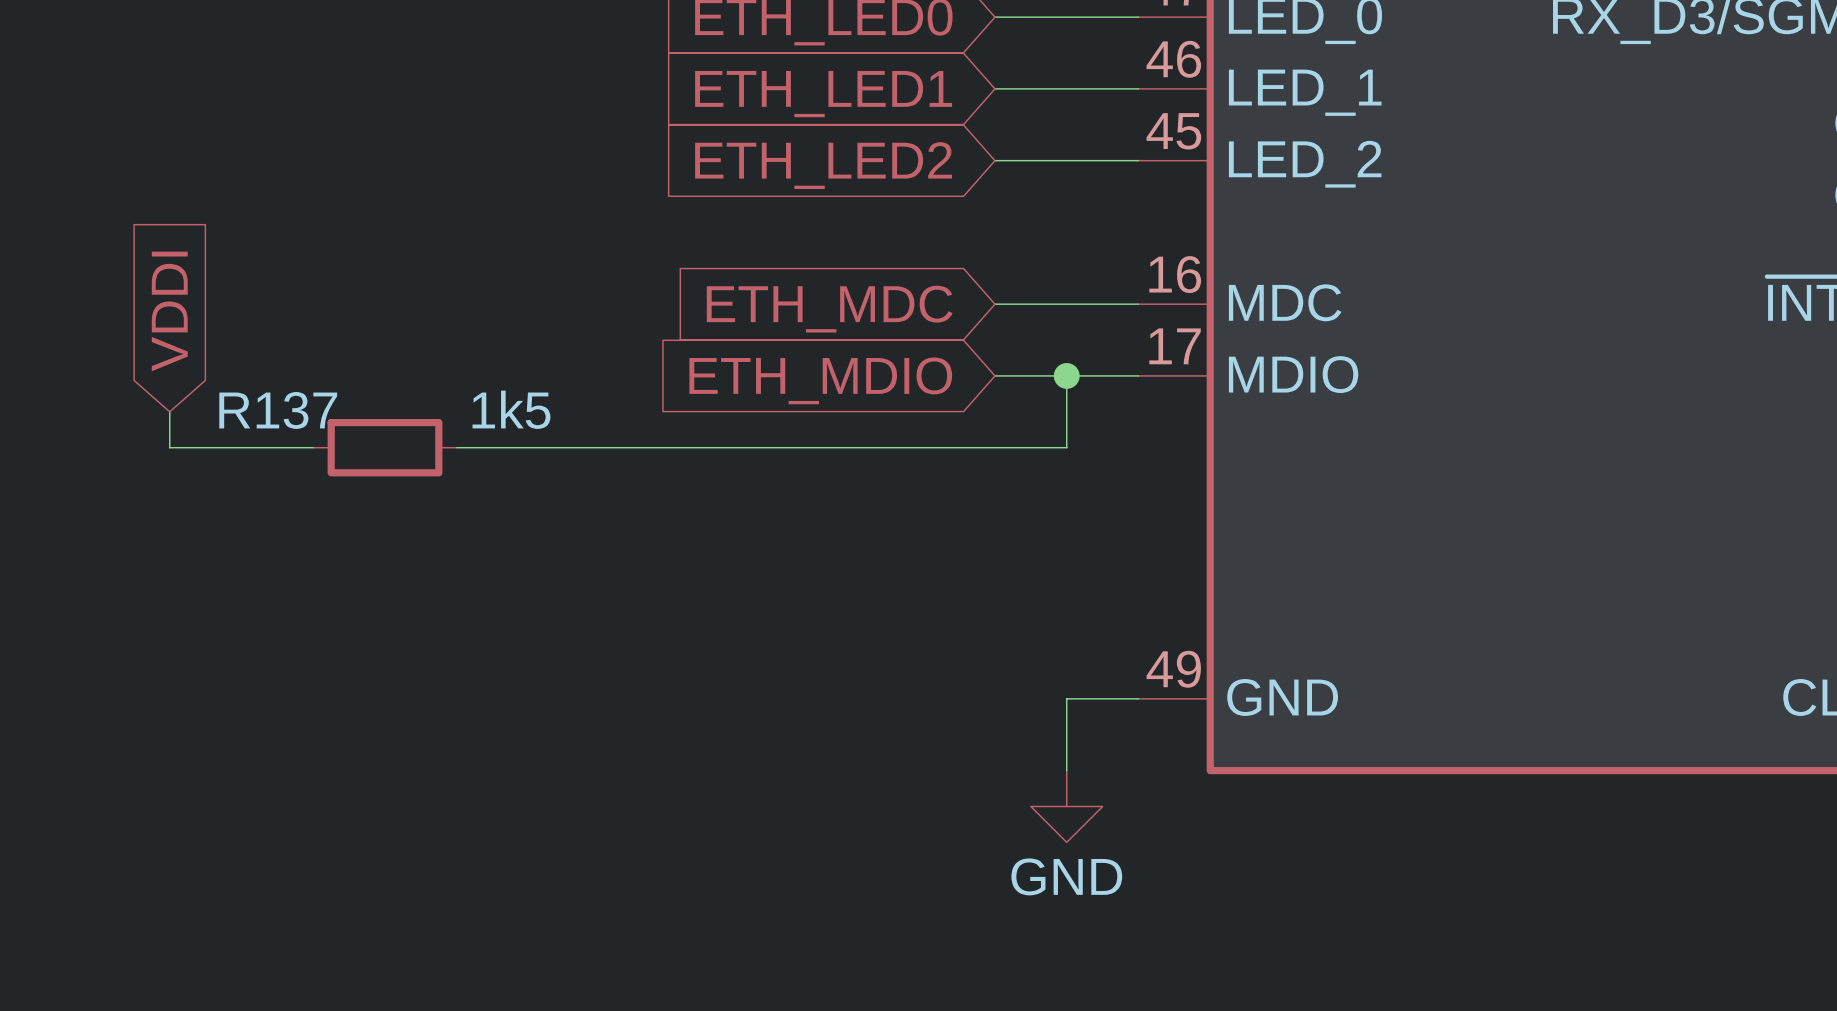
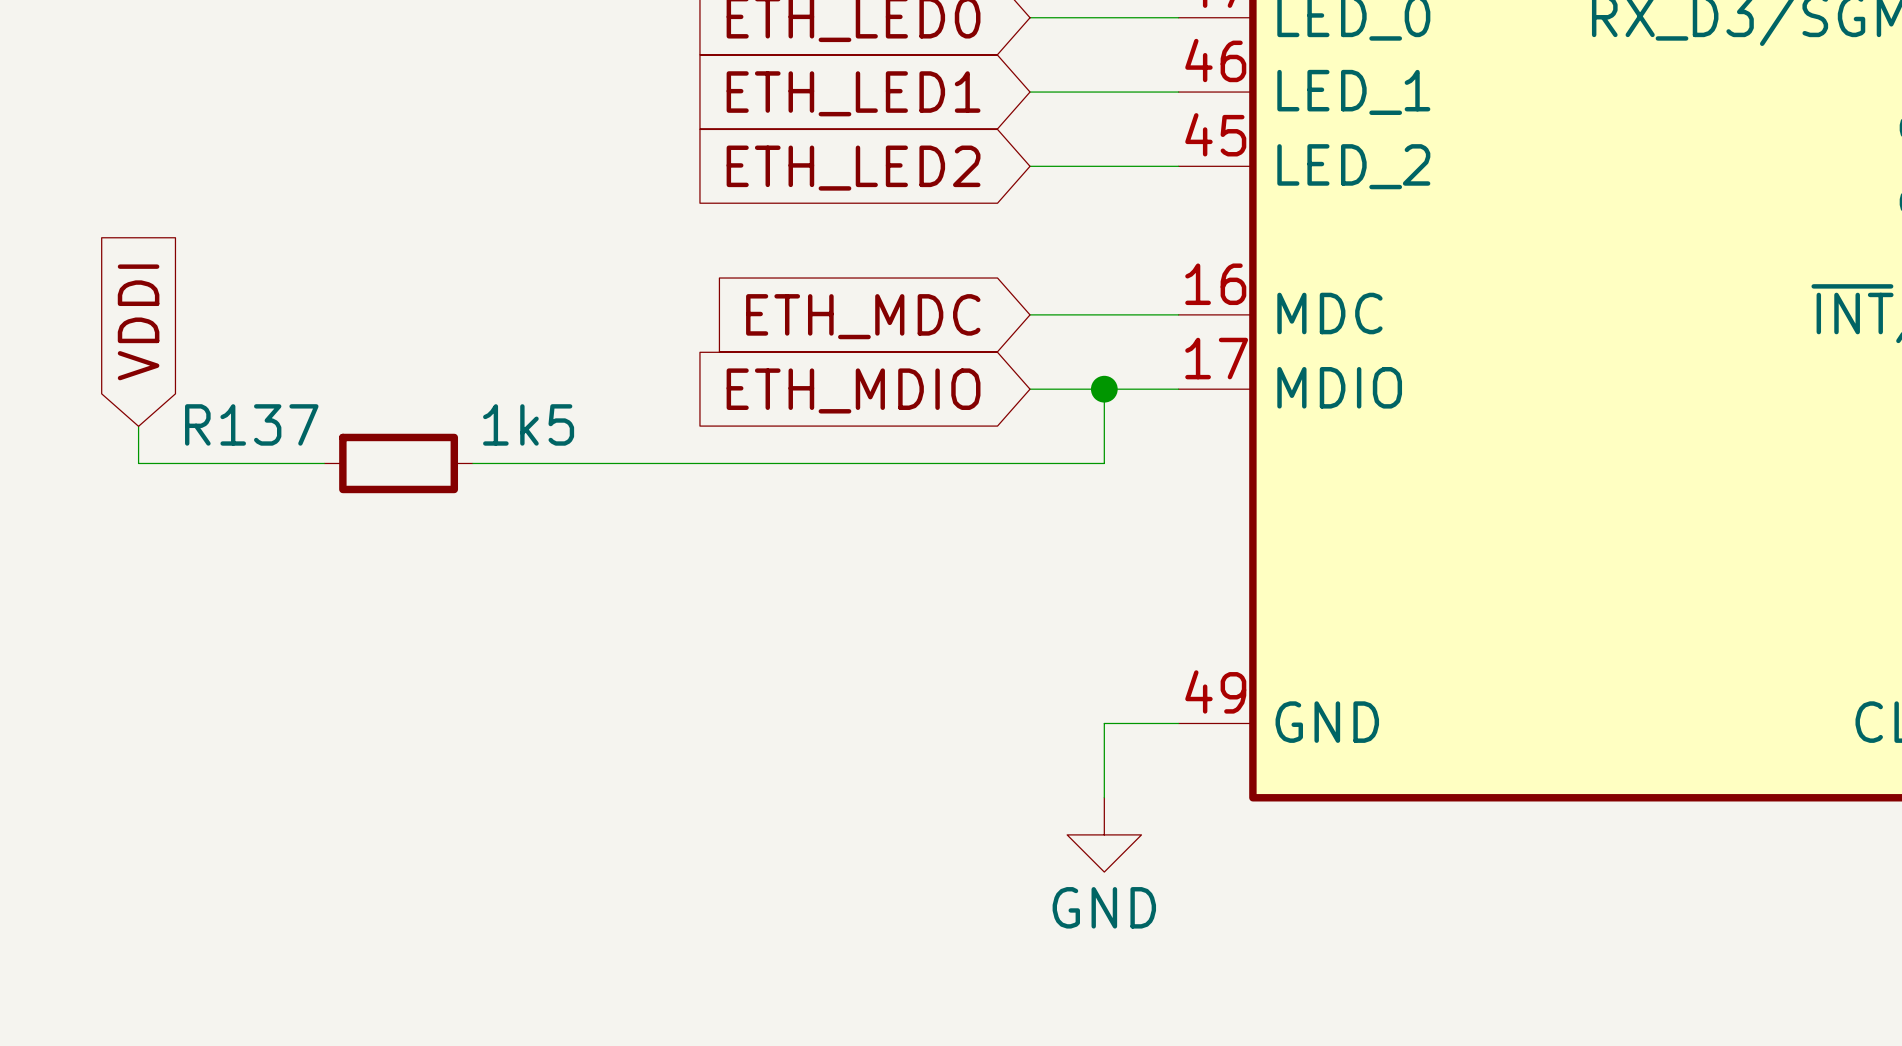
global label position: VDDI (169, 311) -> VDDI (138, 322)
R137 name position: R137 (278, 410) -> R137 (251, 424)
wire: (169, 411) (169, 447) -> (138, 426) (138, 463) (175, 463)

